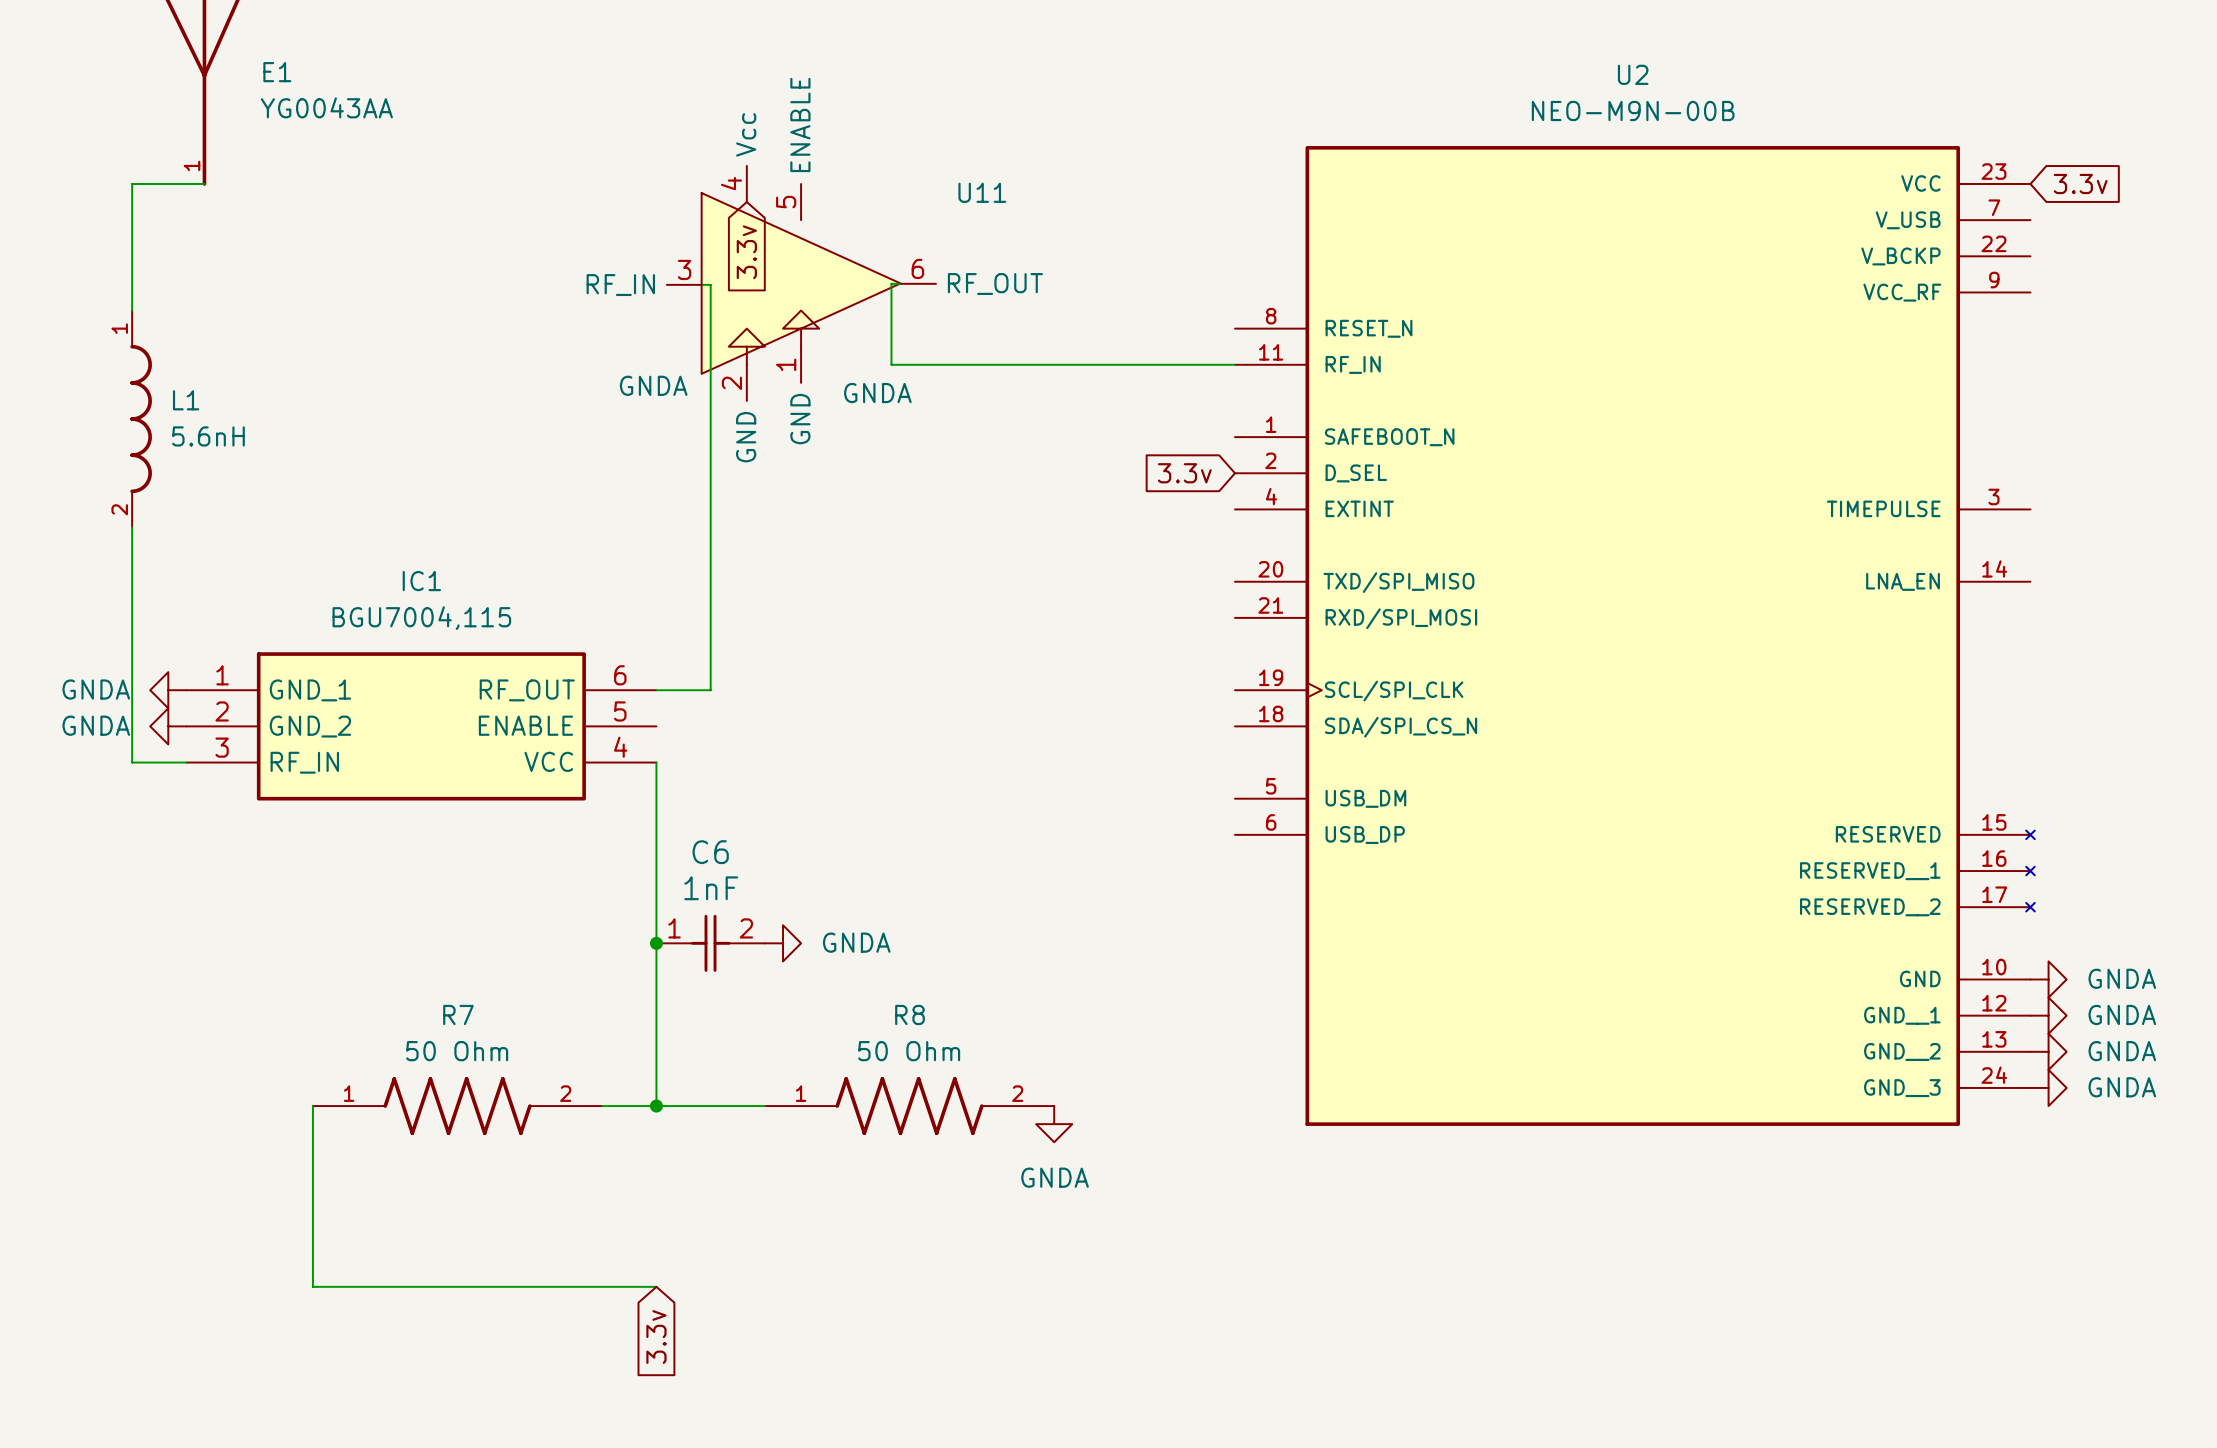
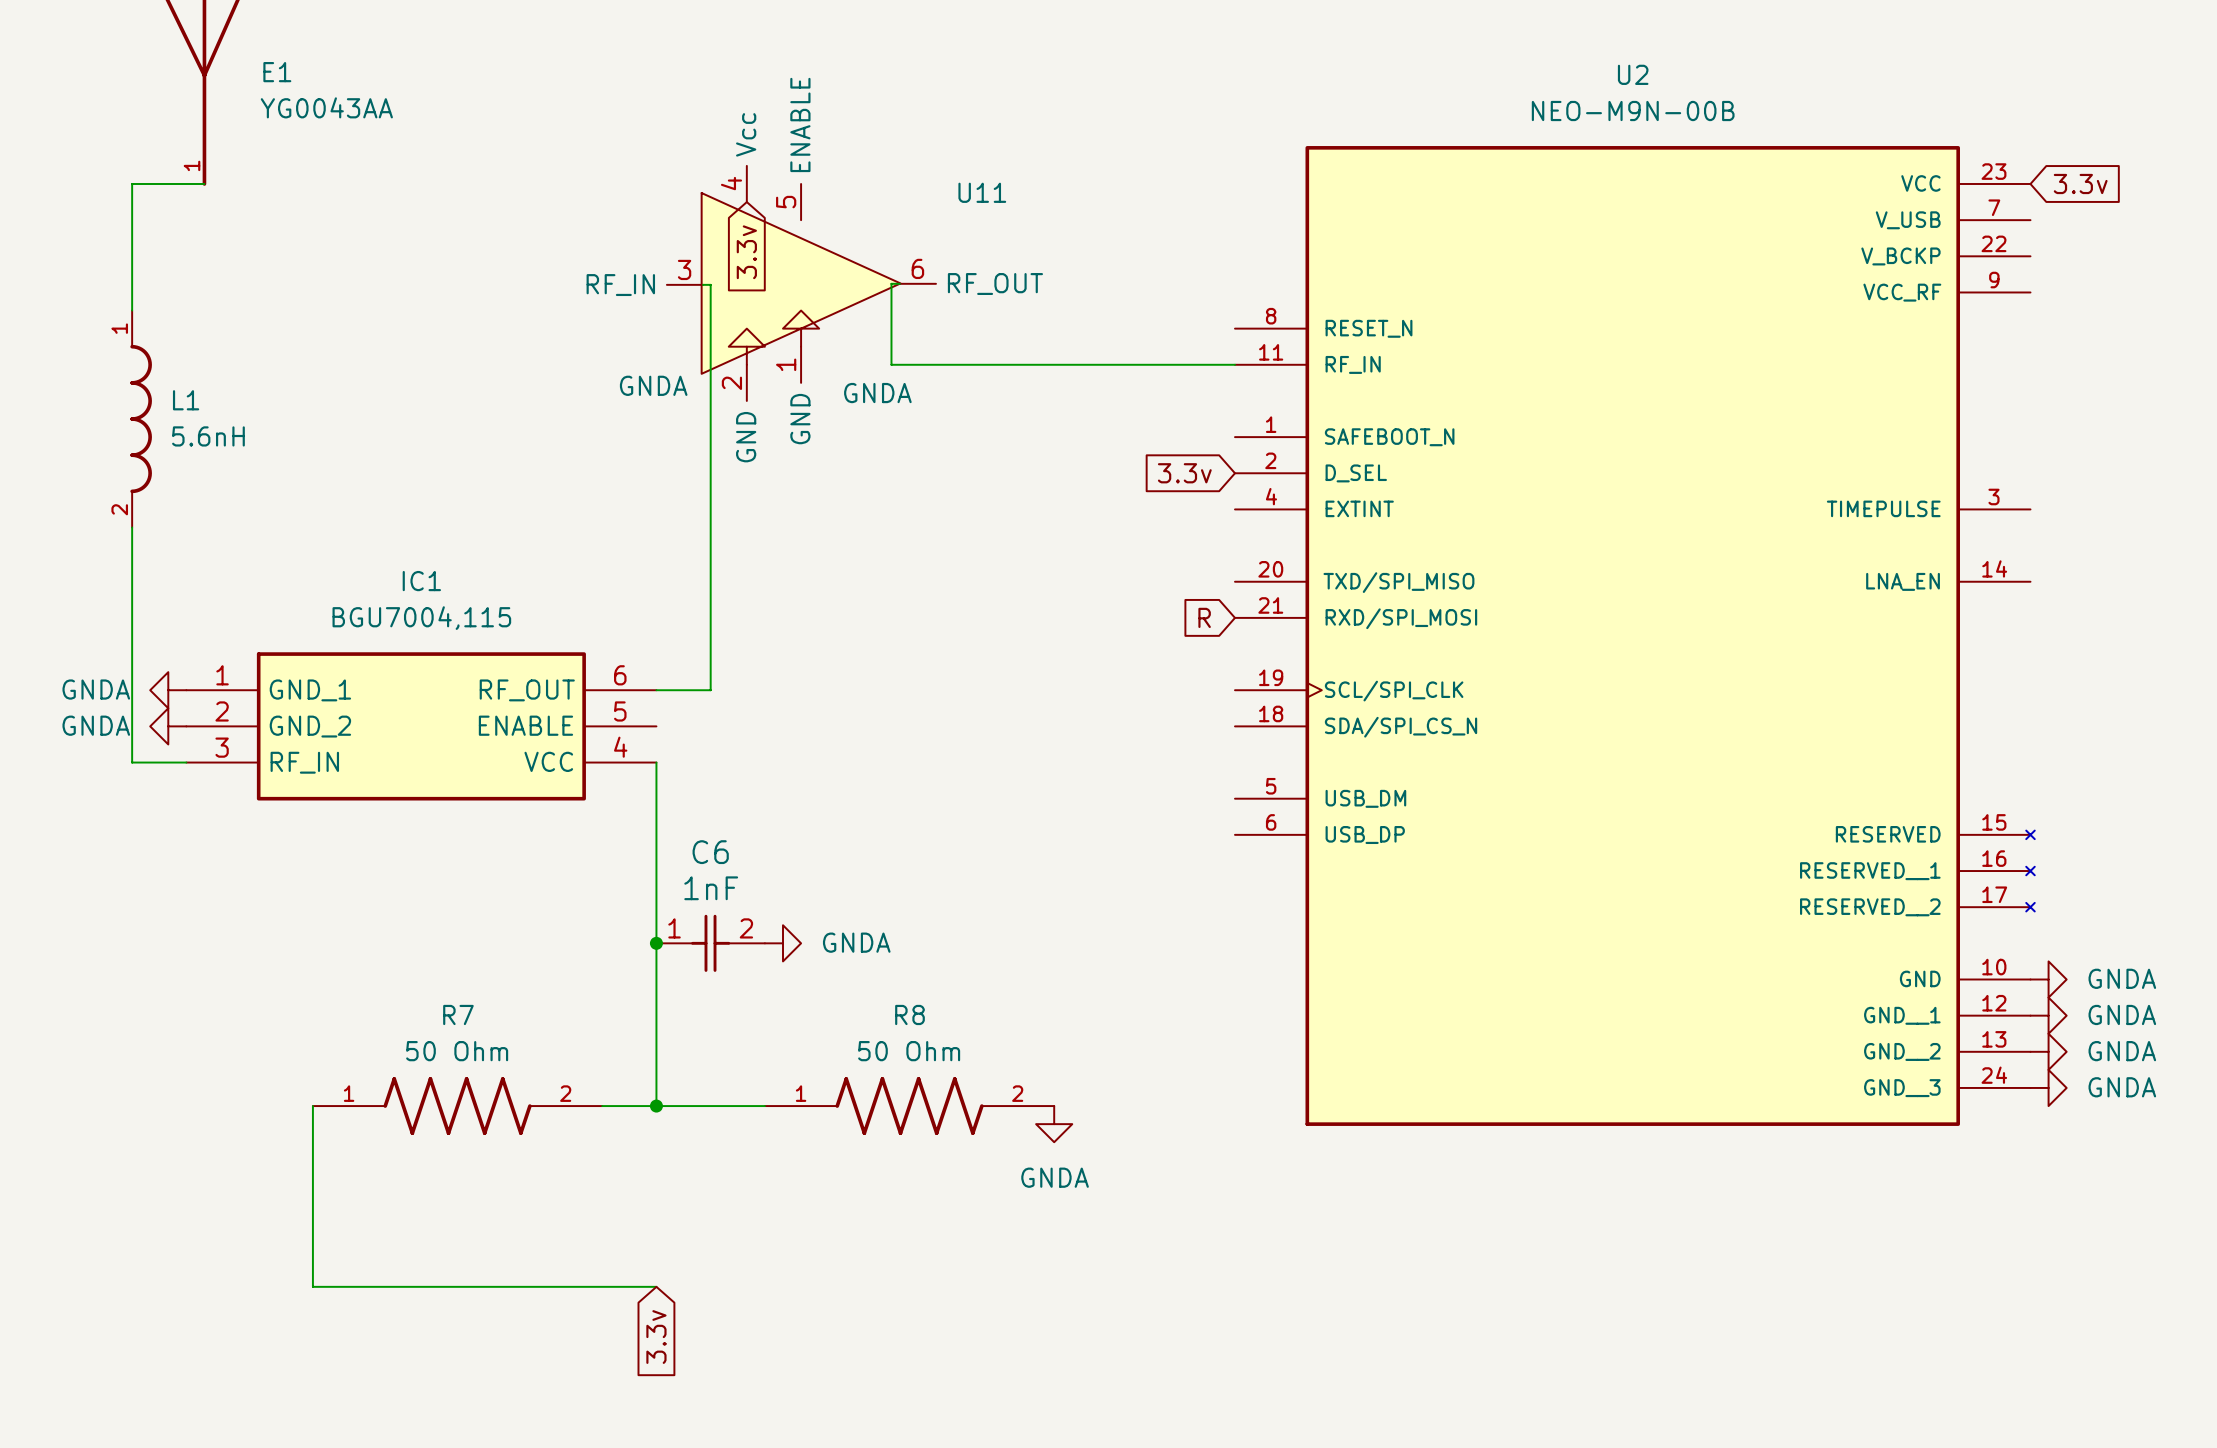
global label: none -> R (1204, 617)

